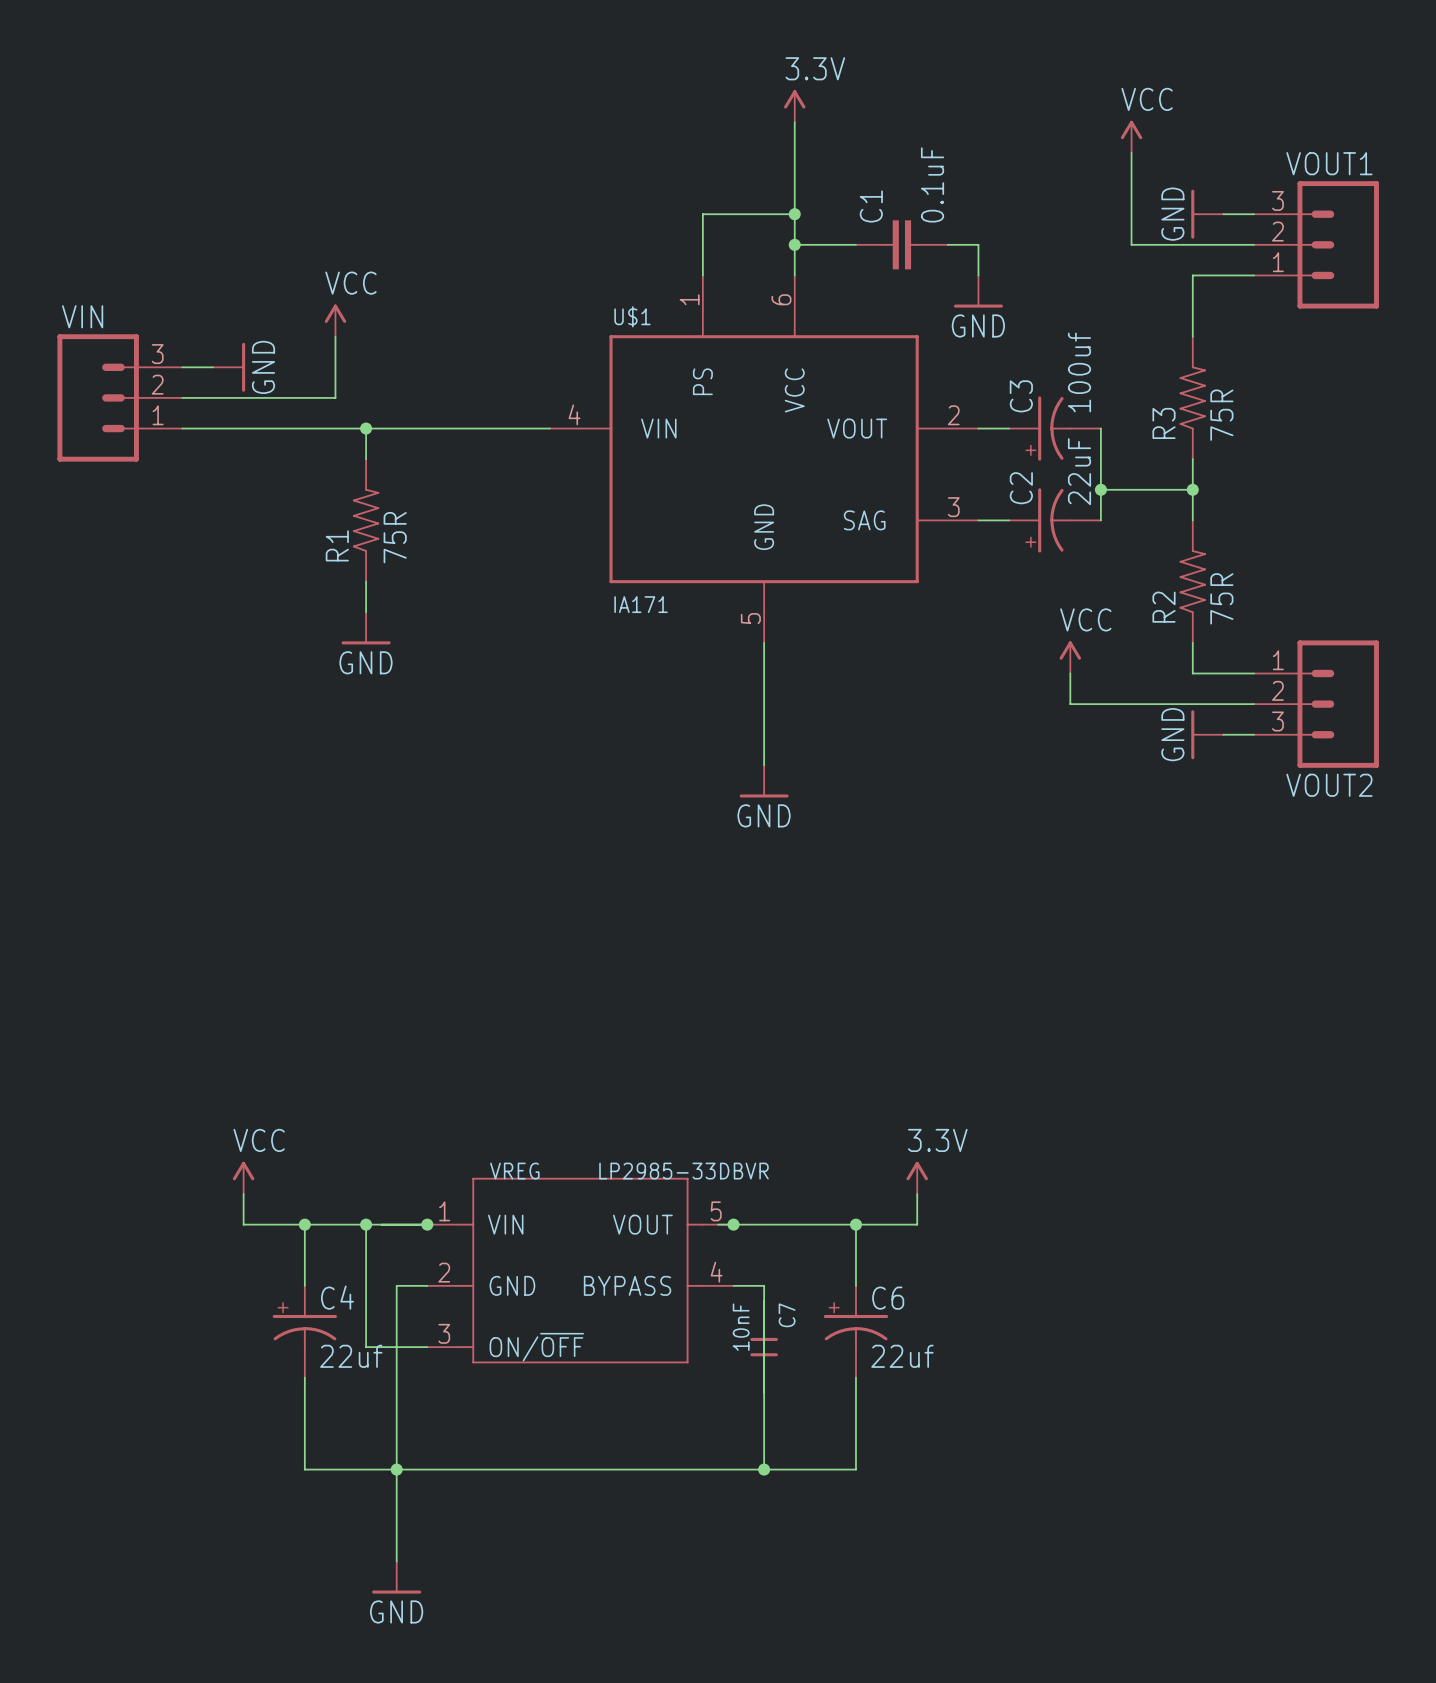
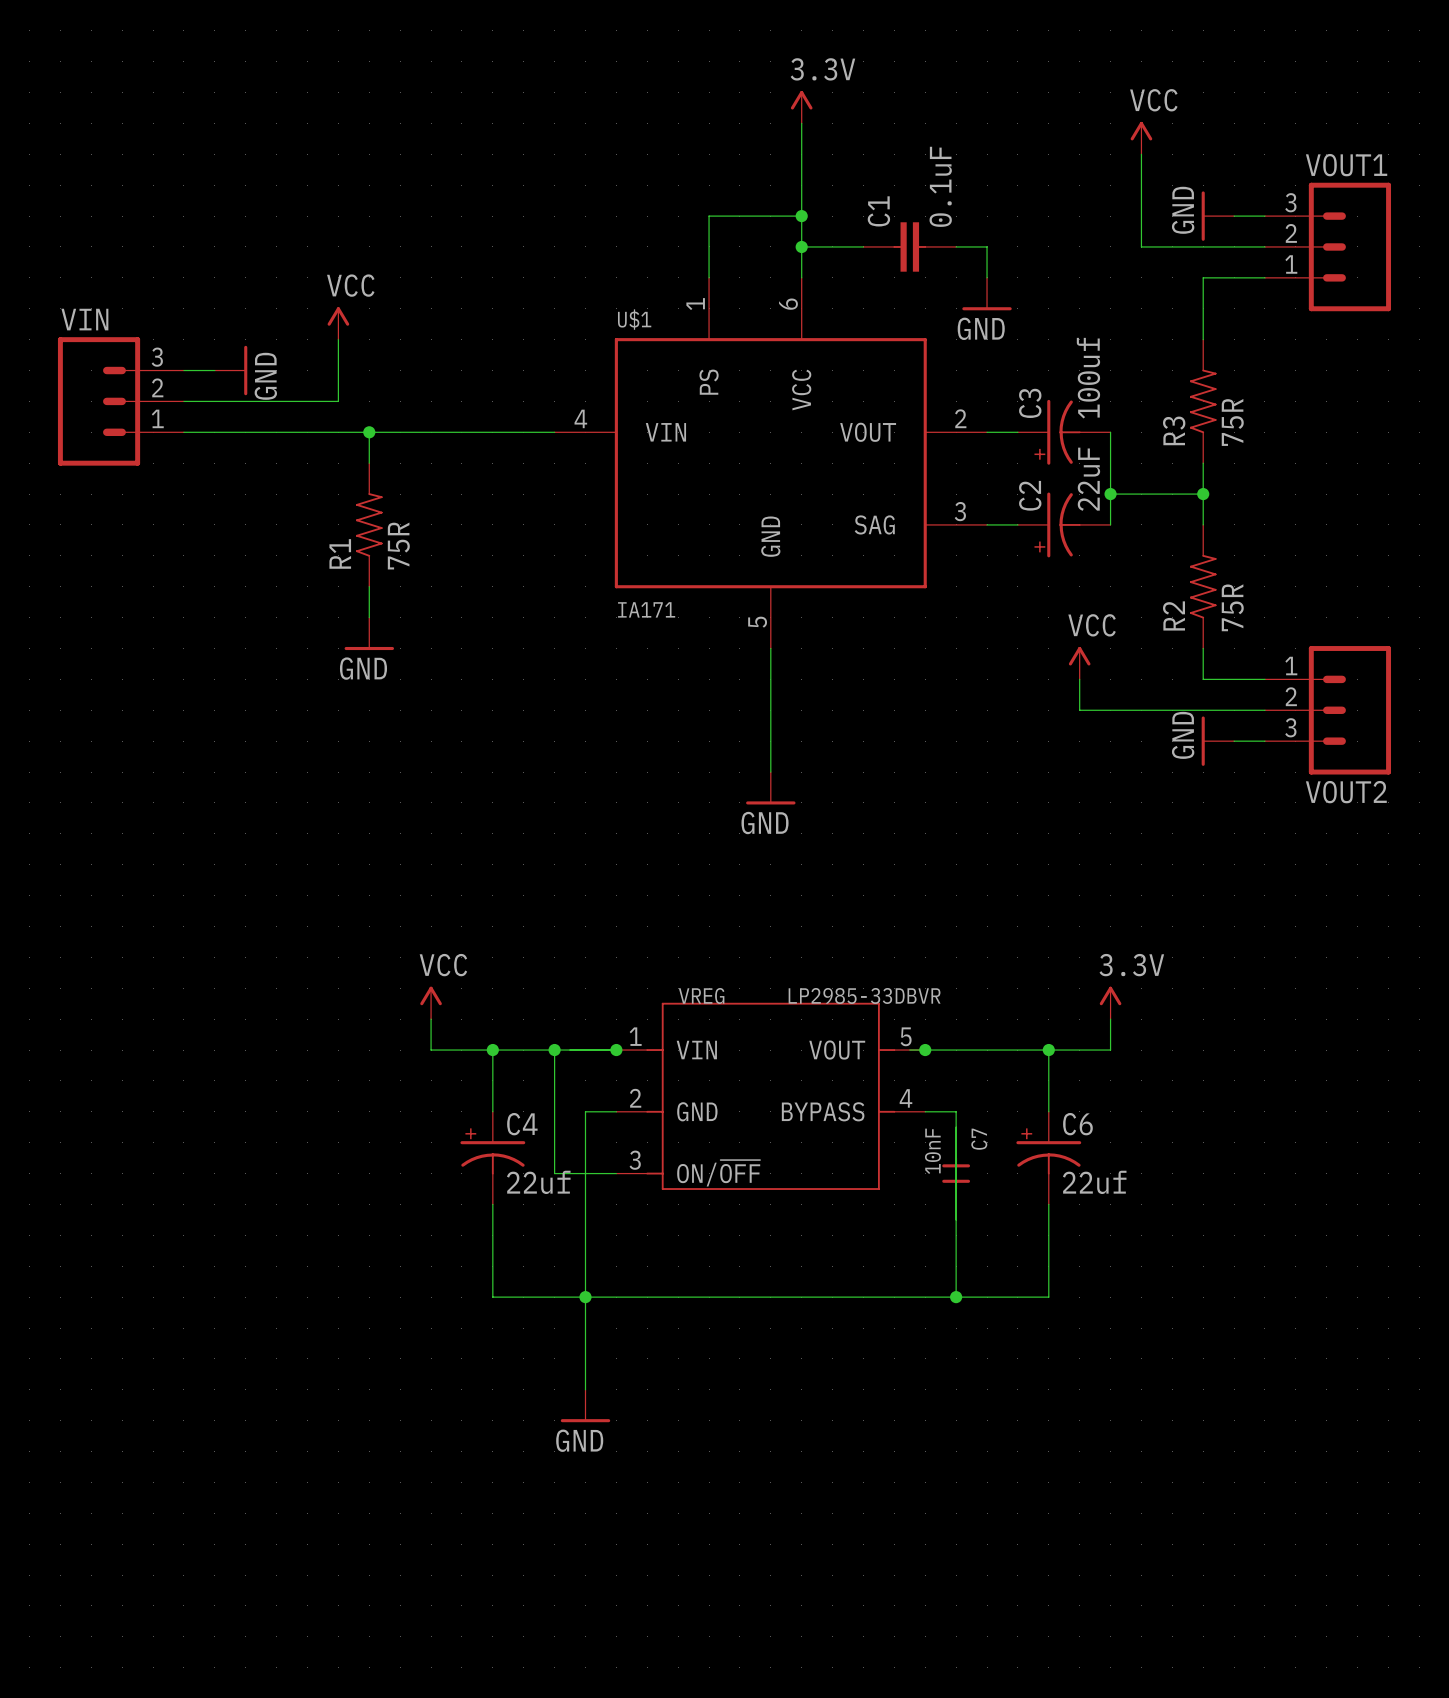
junction: none -> (492, 1050)
junction: none -> (554, 1050)
junction: none -> (616, 1050)
junction: none -> (925, 1050)
junction: none -> (1048, 1050)
wire: none -> (925, 1111) (956, 1111) (956, 1297)
power symbol position: VCC (243, 1177) -> VCC (431, 1002)
power symbol position: 3.3V (917, 1177) -> 3.3V (1110, 1002)
wire: (243, 1194) (243, 1224) (427, 1224) -> (431, 1019) (431, 1050) (616, 1050)
wire: none -> (492, 1204) (492, 1297) (739, 1297)
wire: (917, 1194) (917, 1224) (718, 1224) -> (1110, 1019) (1110, 1050) (909, 1050)
wire: (304, 1224) (304, 1285) -> (492, 1050) (492, 1111)
junction: (304, 1224) -> none
wire: (366, 1224) (366, 1347) (427, 1347) -> (554, 1050) (554, 1173) (616, 1173)
junction: (366, 1224) -> none
junction: (427, 1224) -> none
junction: (733, 1224) -> none
wire: (855, 1224) (855, 1285) -> (1048, 1050) (1048, 1111)
junction: (855, 1224) -> none
VREG position: (580, 1270) -> (770, 1096)
wire: (427, 1285) (396, 1285) (396, 1561) -> (616, 1111) (585, 1111) (585, 1389)
junction: none -> (585, 1297)
wire: (764, 1285) (764, 1469) -> (770, 1297) (1048, 1297) (1048, 1204)
junction: none -> (956, 1297)
C4 position: (304, 1331) -> (492, 1158)
C6 position: (855, 1331) -> (1048, 1158)
C7 position: (764, 1347) -> (956, 1173)
wire: (304, 1377) (304, 1469) (855, 1469) (855, 1377) -> none
junction: (396, 1469) -> none
junction: (764, 1469) -> none
power symbol position: GND (396, 1577) -> GND (585, 1405)

